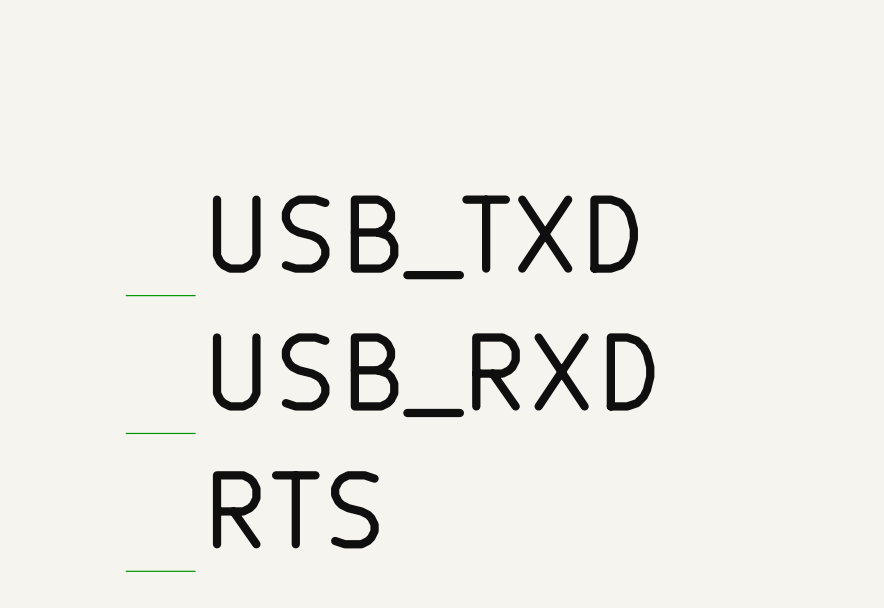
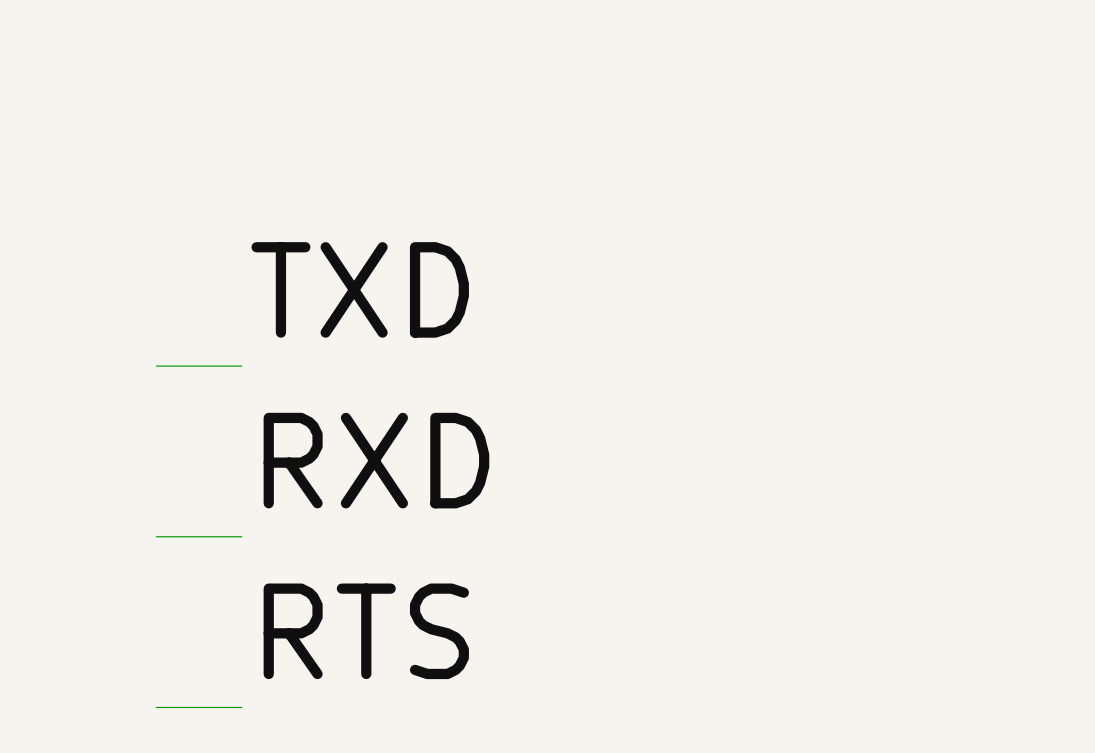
label: USB_TXD (425, 237) -> TXD (360, 289)
label: USB_RXD (433, 375) -> RXD (376, 460)

